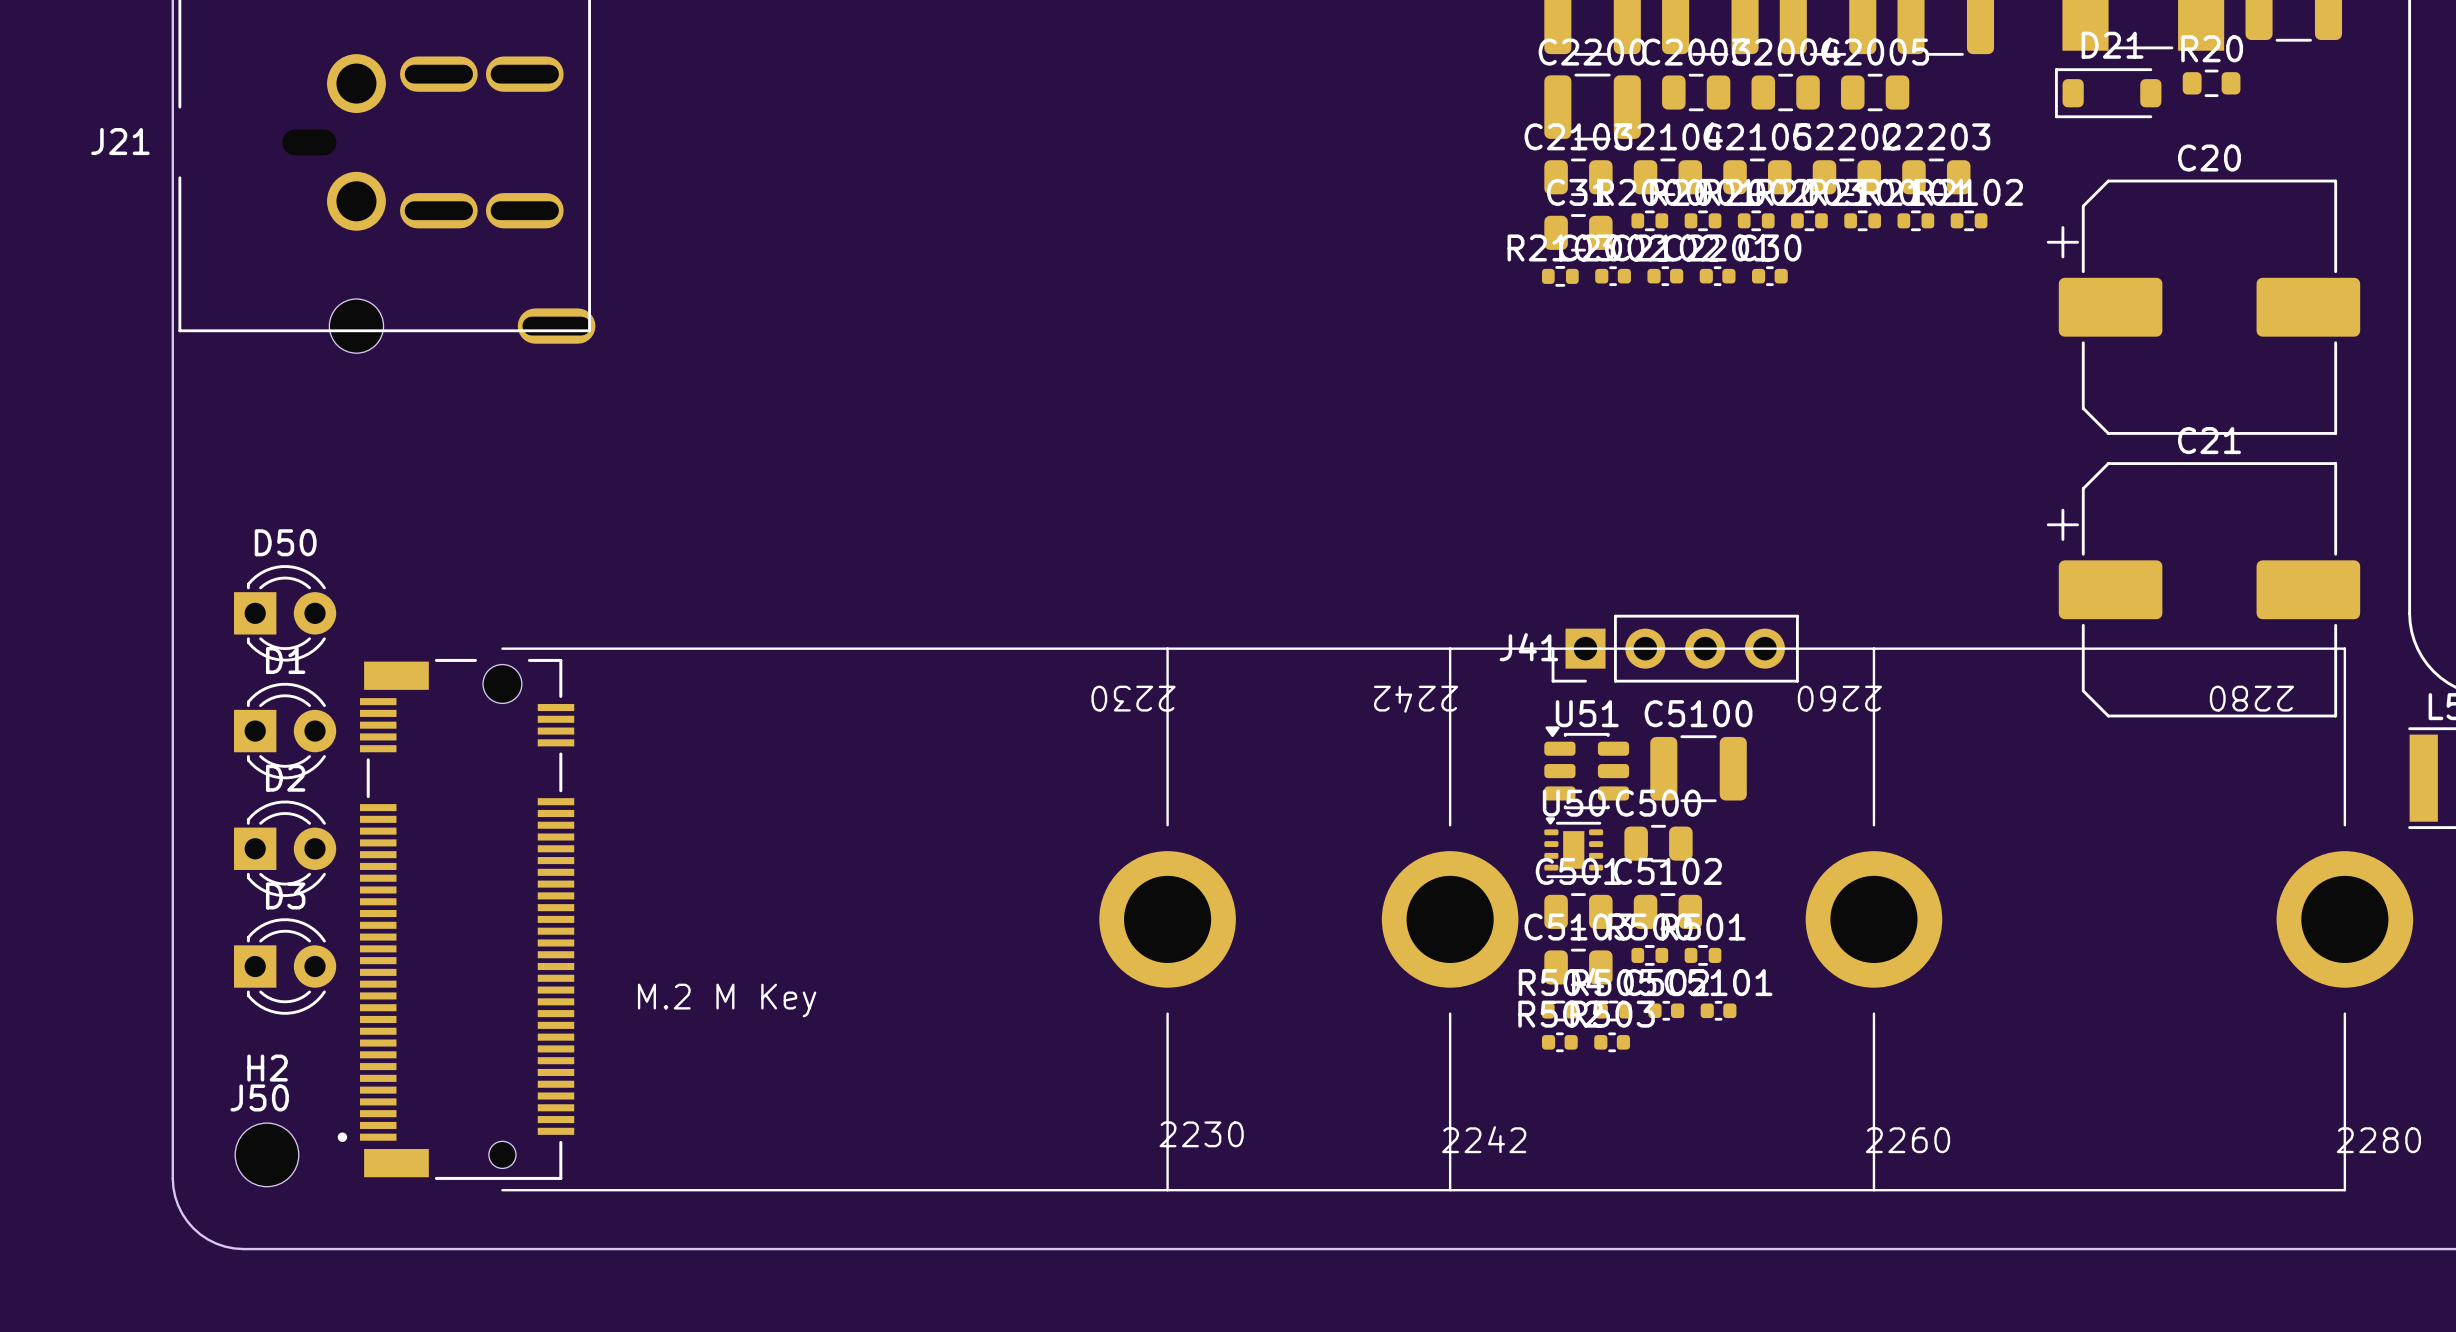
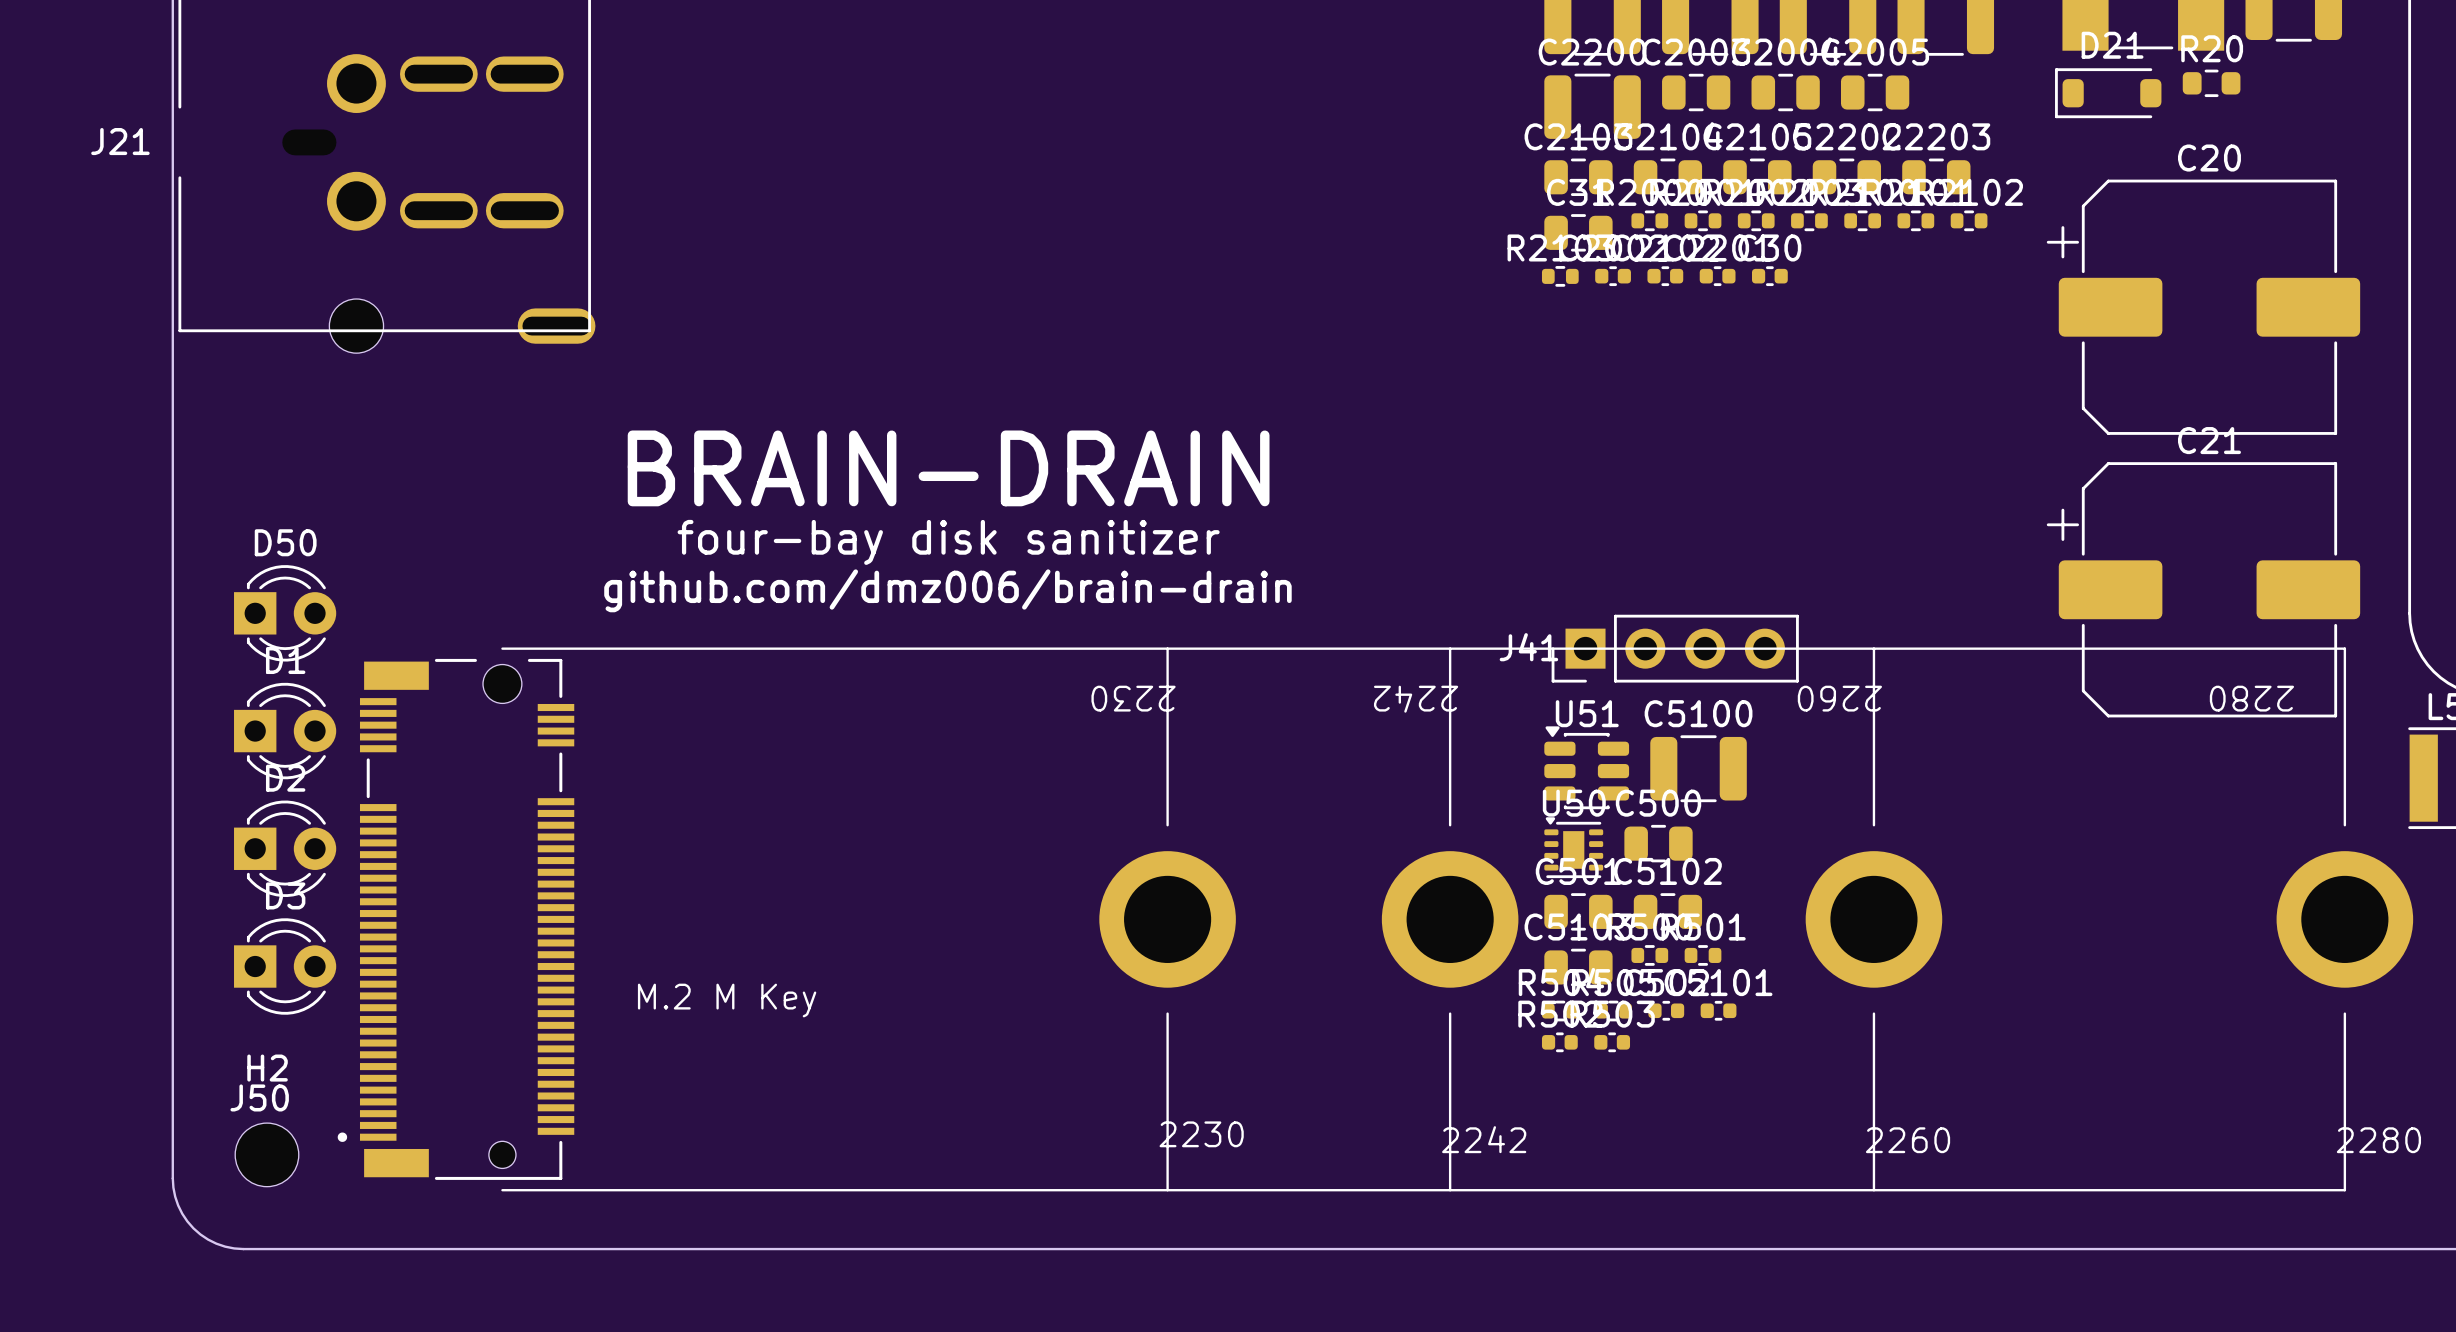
text: none -> BRAIN-DRAIN (948, 468)
text: none -> four-bay disk sanitizer (948, 542)
text: none -> github.com/dmz006/brain-drain (947, 590)

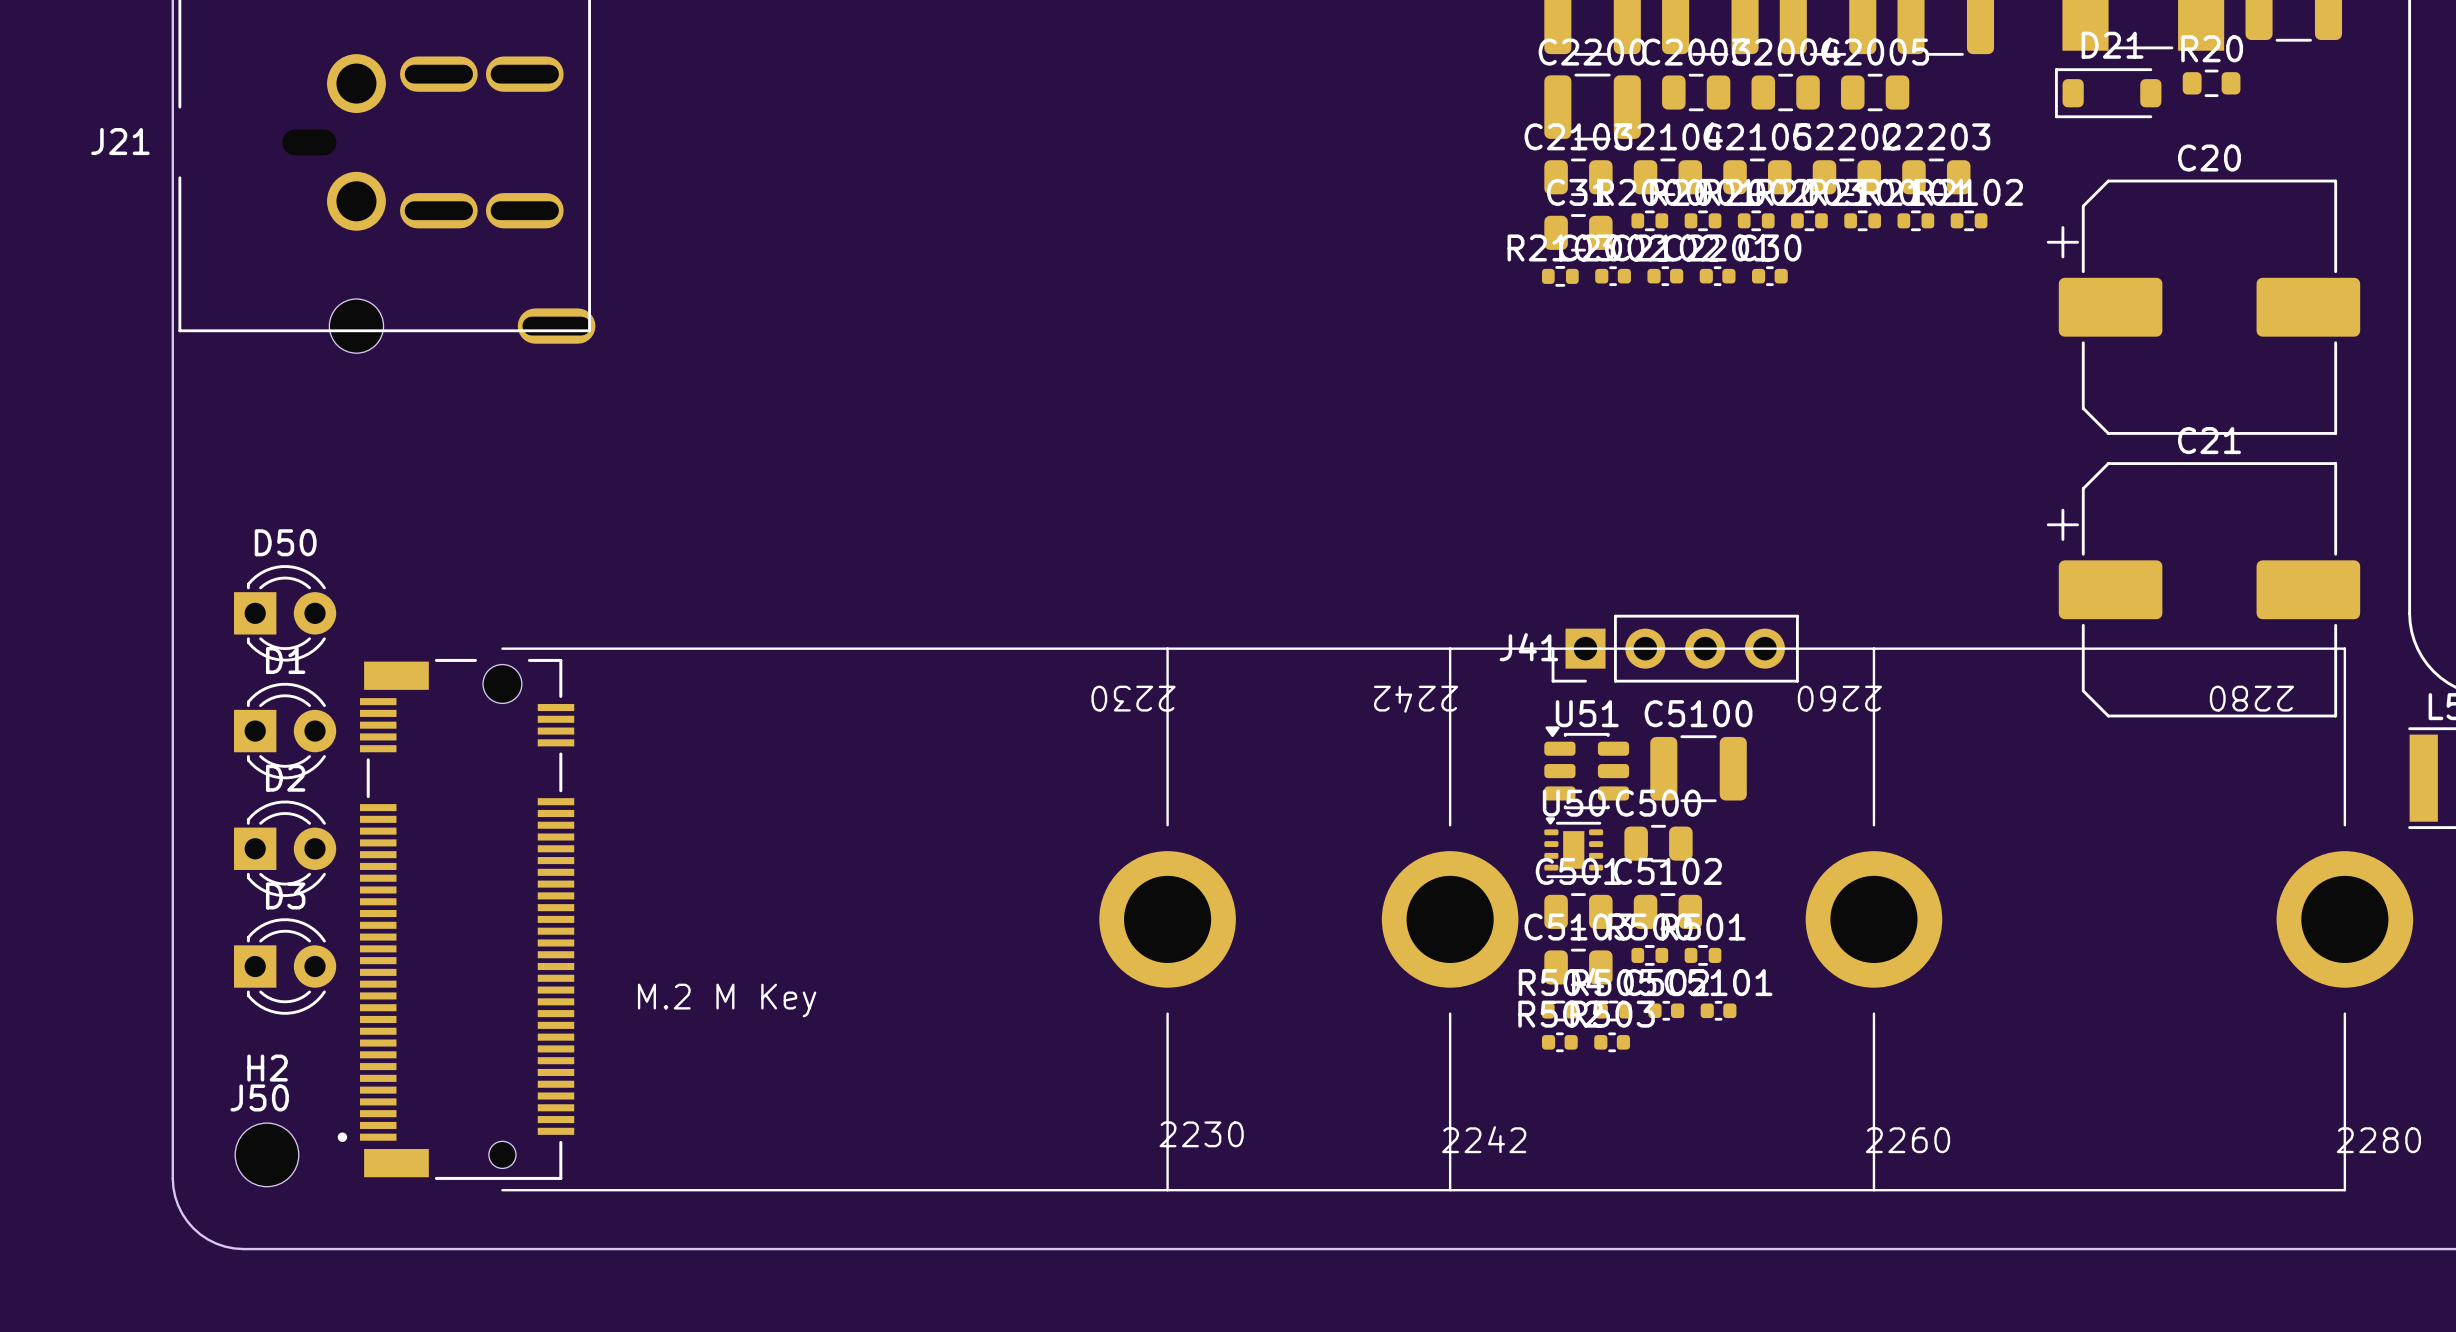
text: BRAIN-DRAIN (948, 468) -> none
text: four-bay disk sanitizer (948, 542) -> none
text: github.com/dmz006/brain-drain (947, 590) -> none

